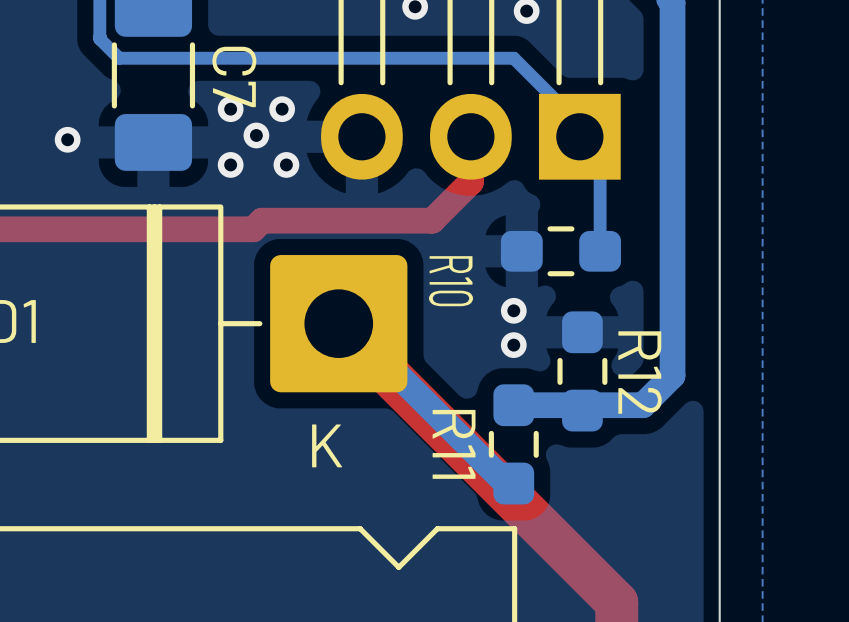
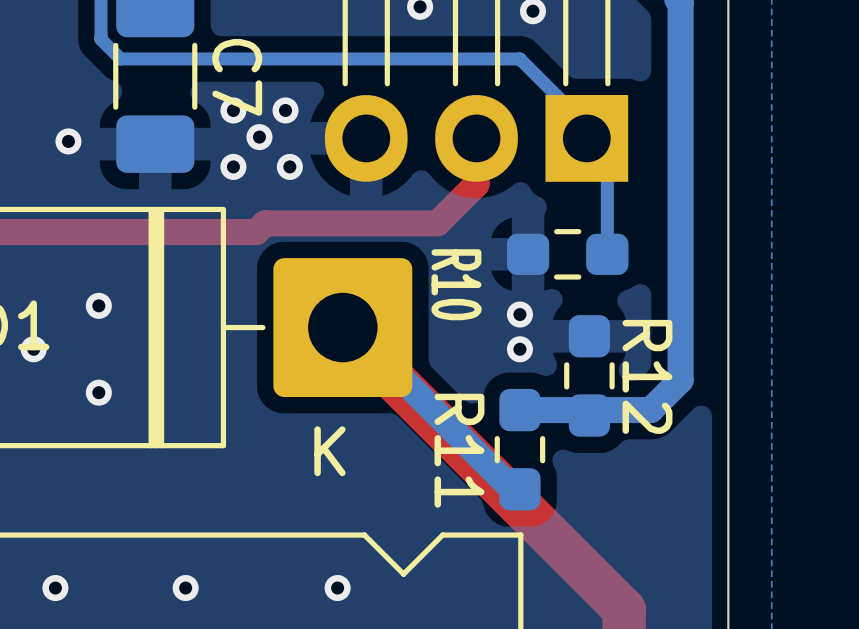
via: none -> (98, 305)
via: none -> (33, 349)
via: none -> (98, 392)
via: none -> (55, 588)
via: none -> (185, 588)
via: none -> (337, 588)

